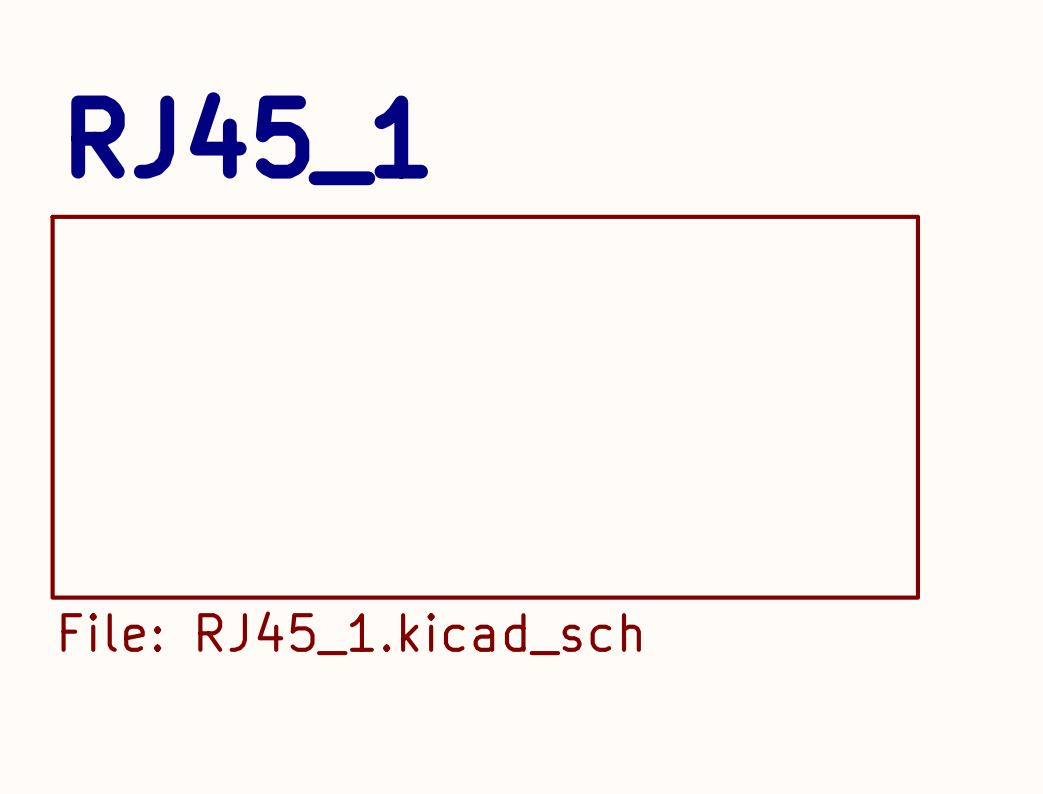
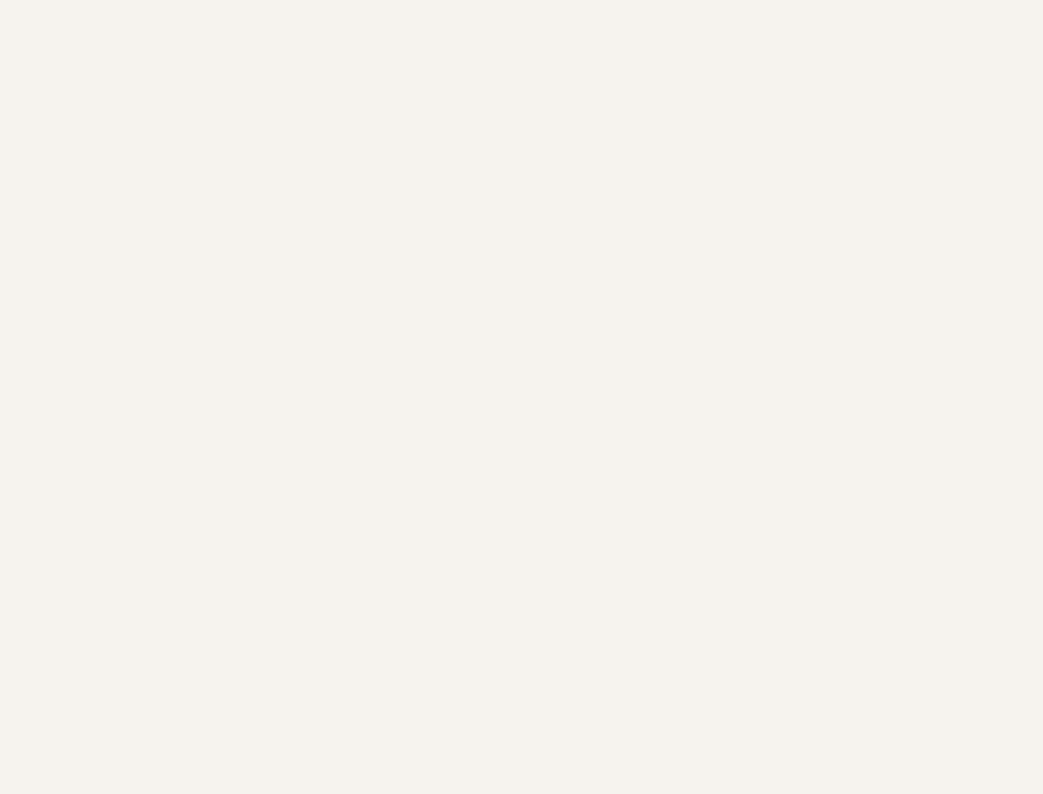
sheet RJ45_1: File: RJ45_1.kicad_sch (485, 407) -> none

